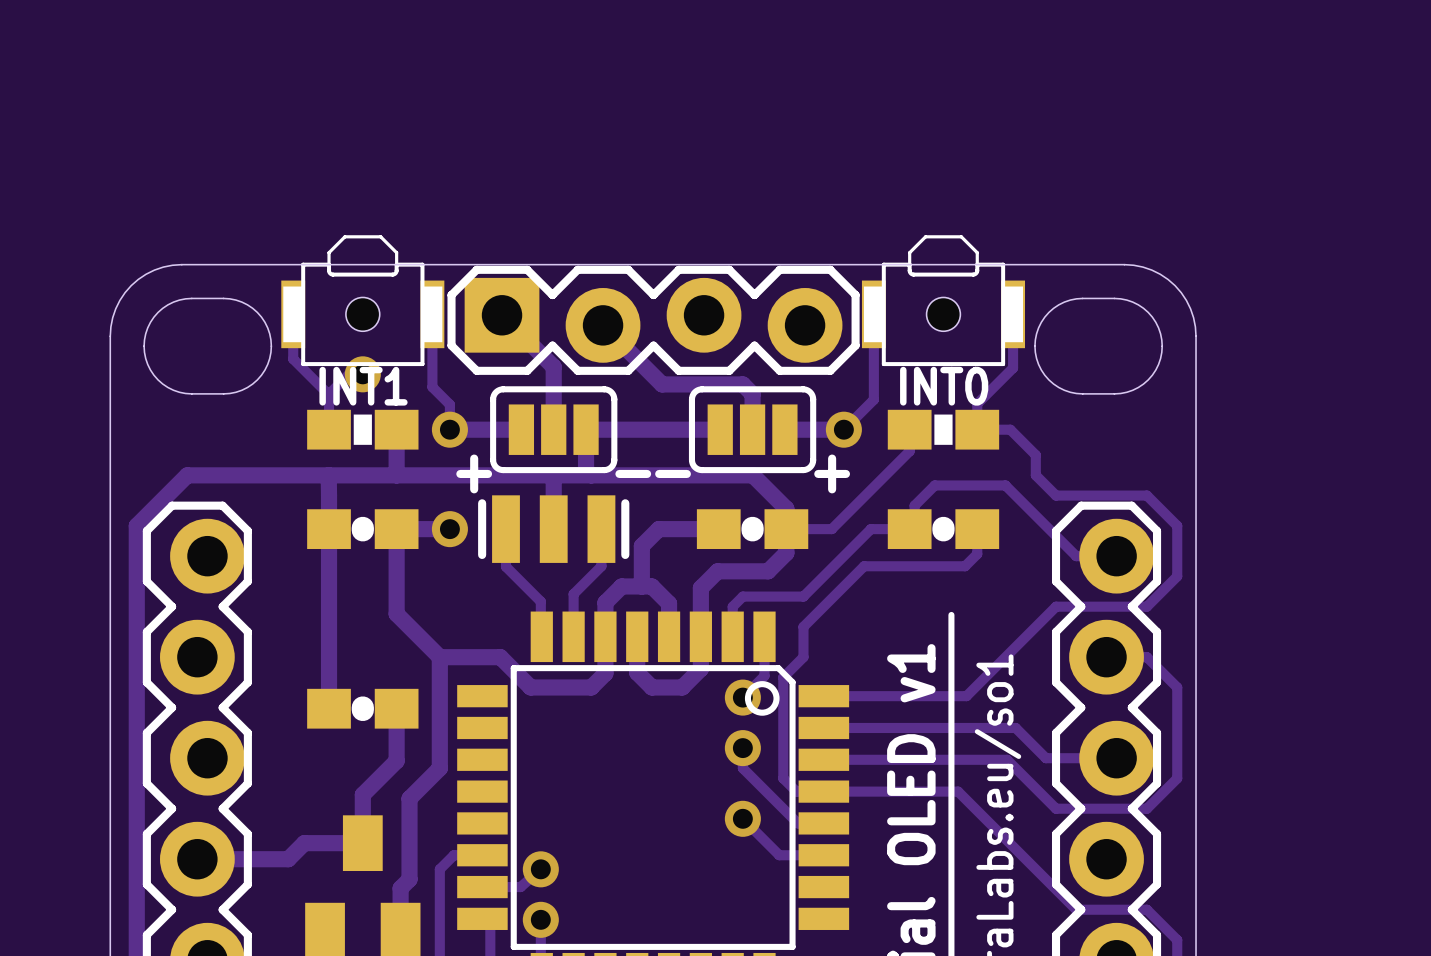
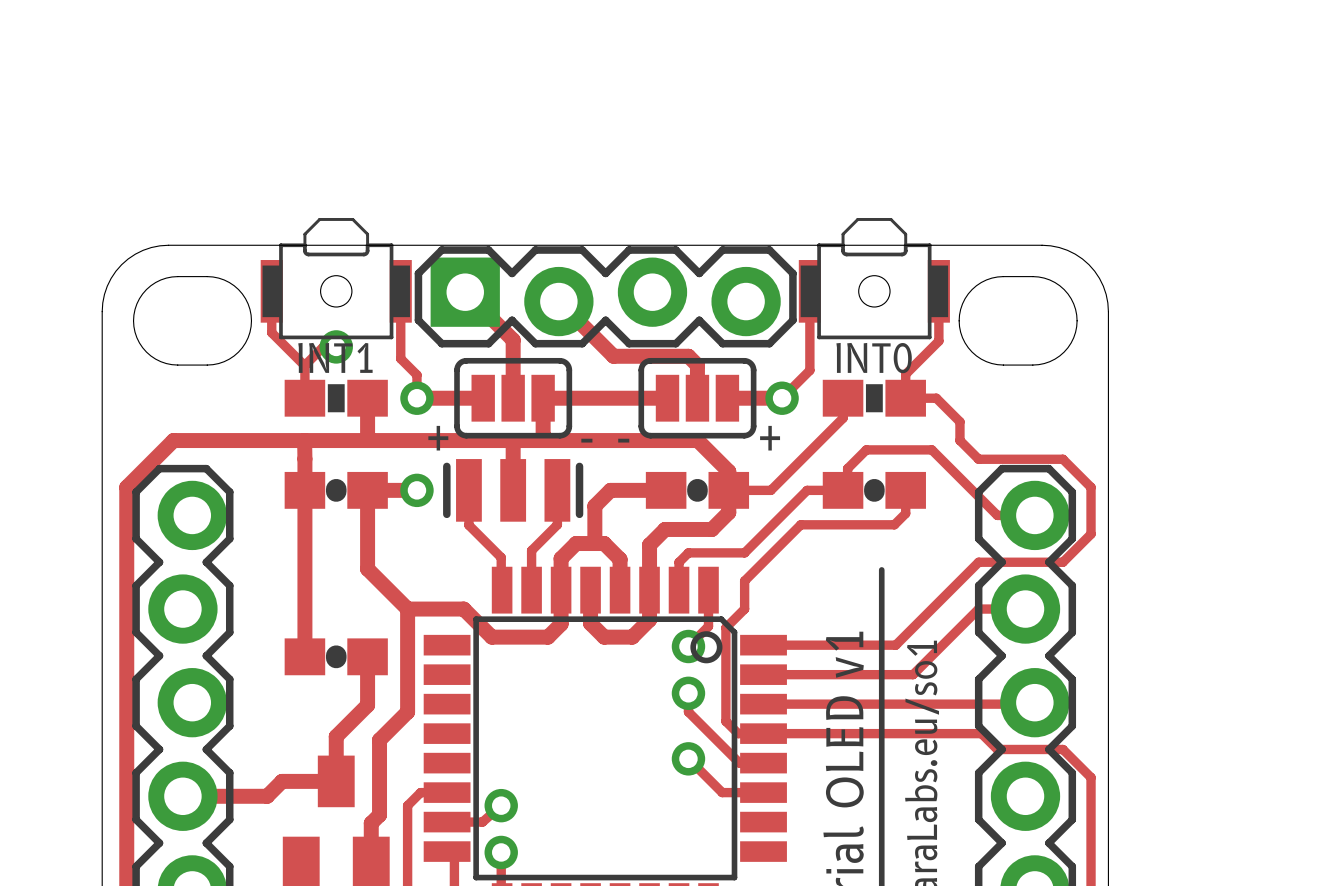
track: (1106, 657) (1146, 657) (1177, 687) (1177, 778) (1146, 808) -> (1025, 609) (978, 609) (913, 674)
track: (985, 727) (1015, 727) (1045, 758) (1116, 758) -> (933, 704) (1034, 702)
track: (1007, 759) (1056, 808) (1076, 808) -> (887, 733) (981, 733) (997, 749)
track: (958, 791) (1076, 909) (1146, 909) (1177, 940) -> (1062, 749) (1091, 777) (1091, 871)

